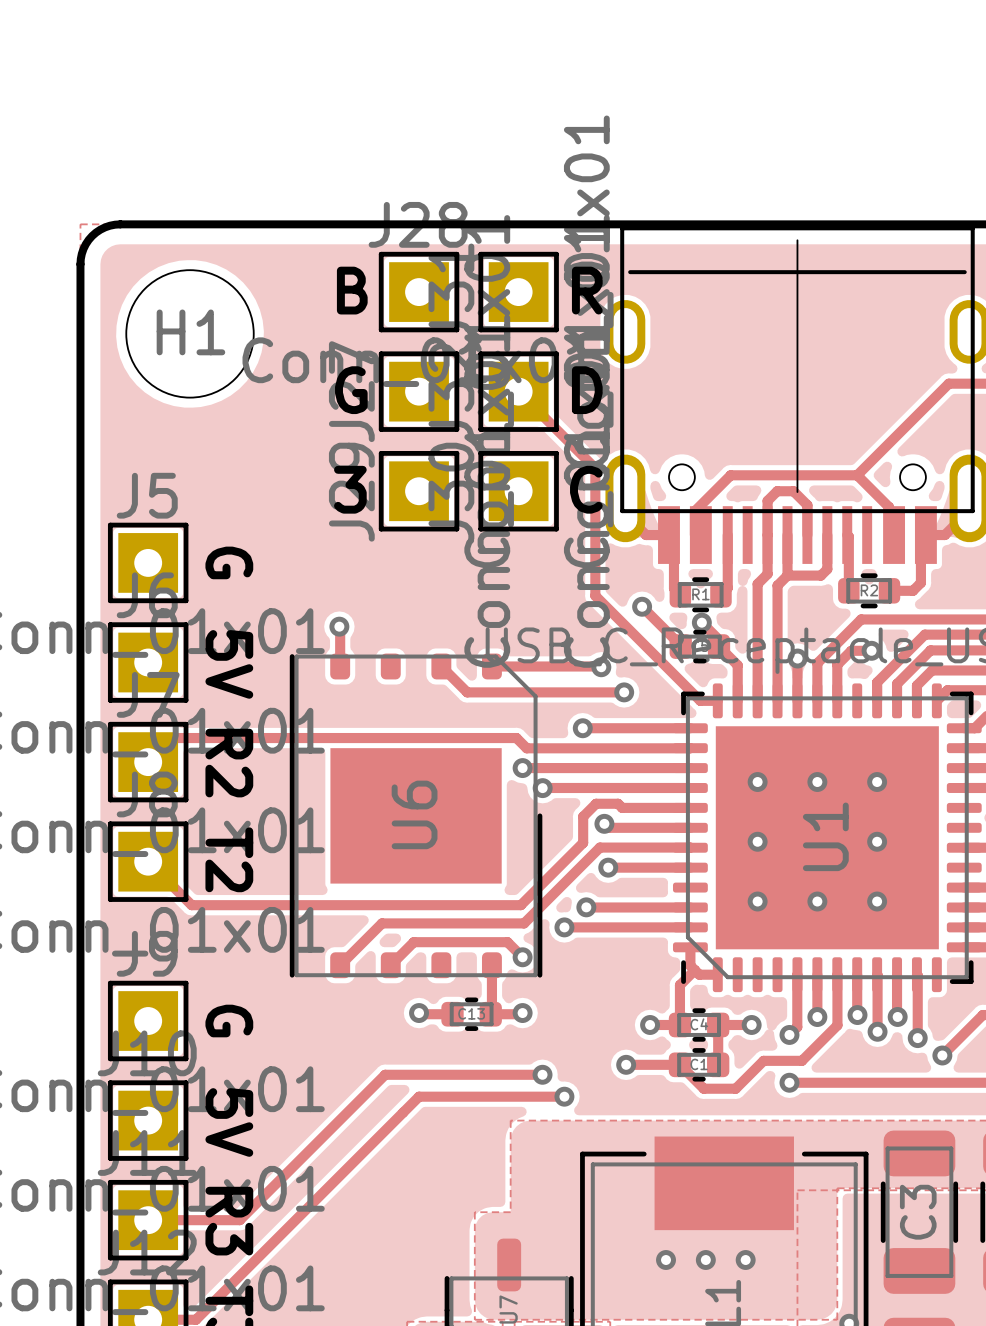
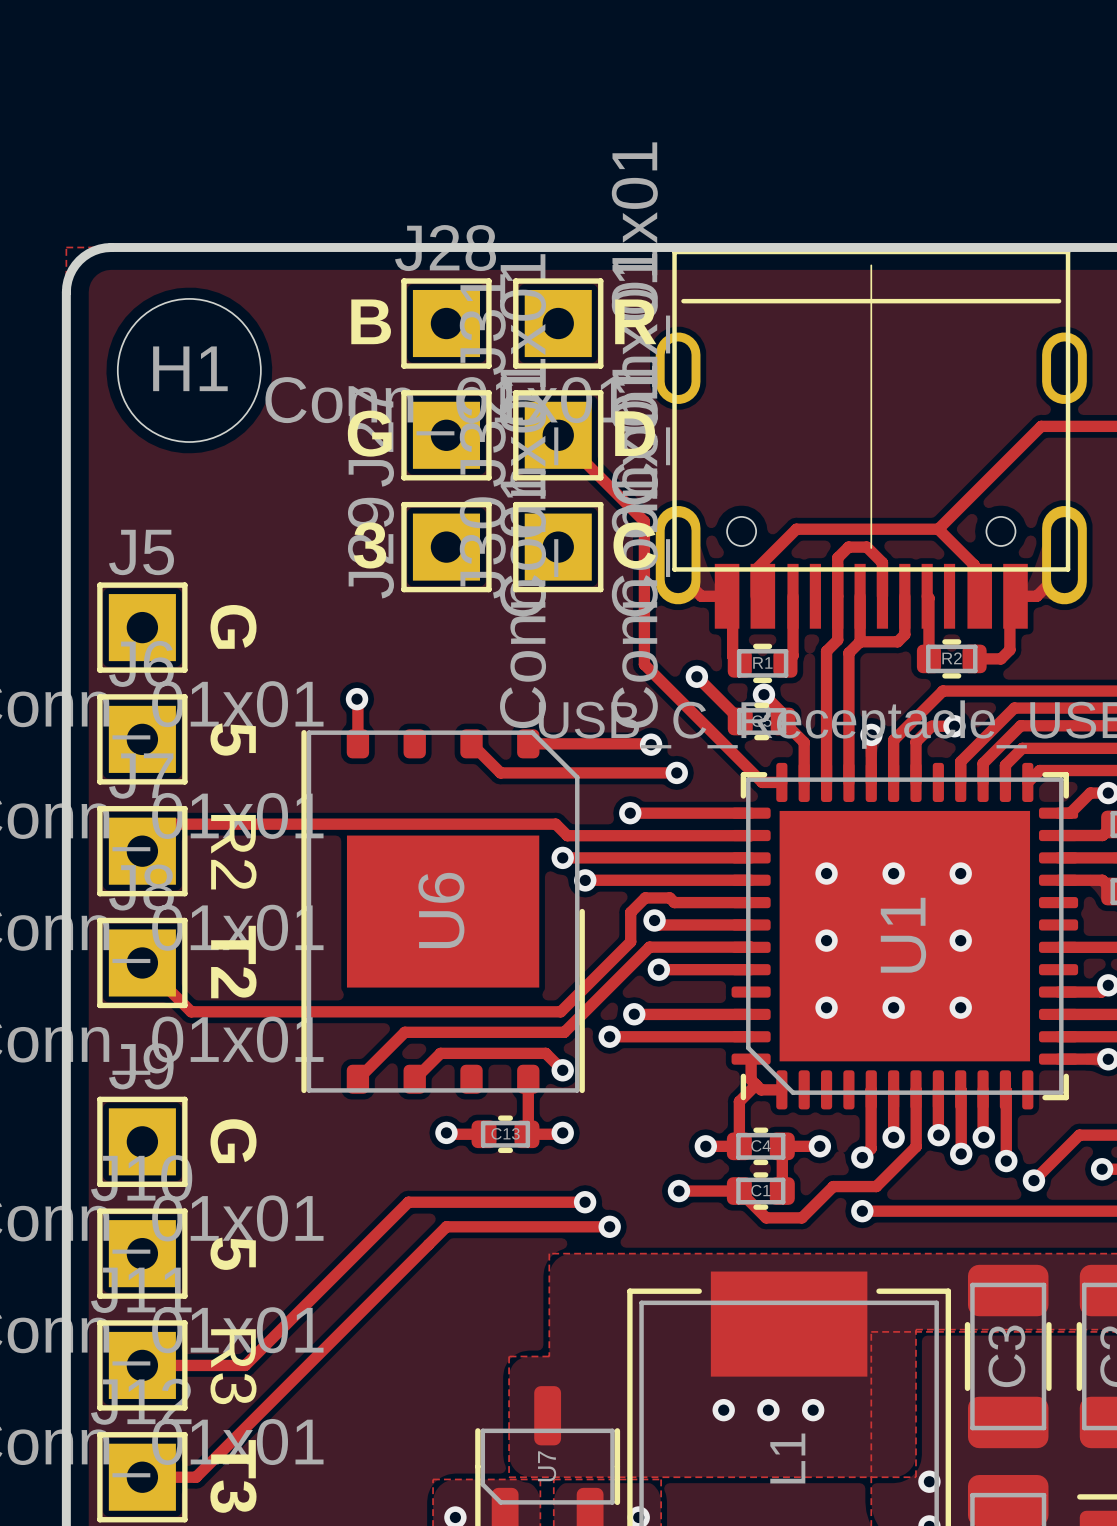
text: 5V (229, 664) -> 5 (233, 739)
text: 5V (229, 1122) -> 5 (233, 1253)

